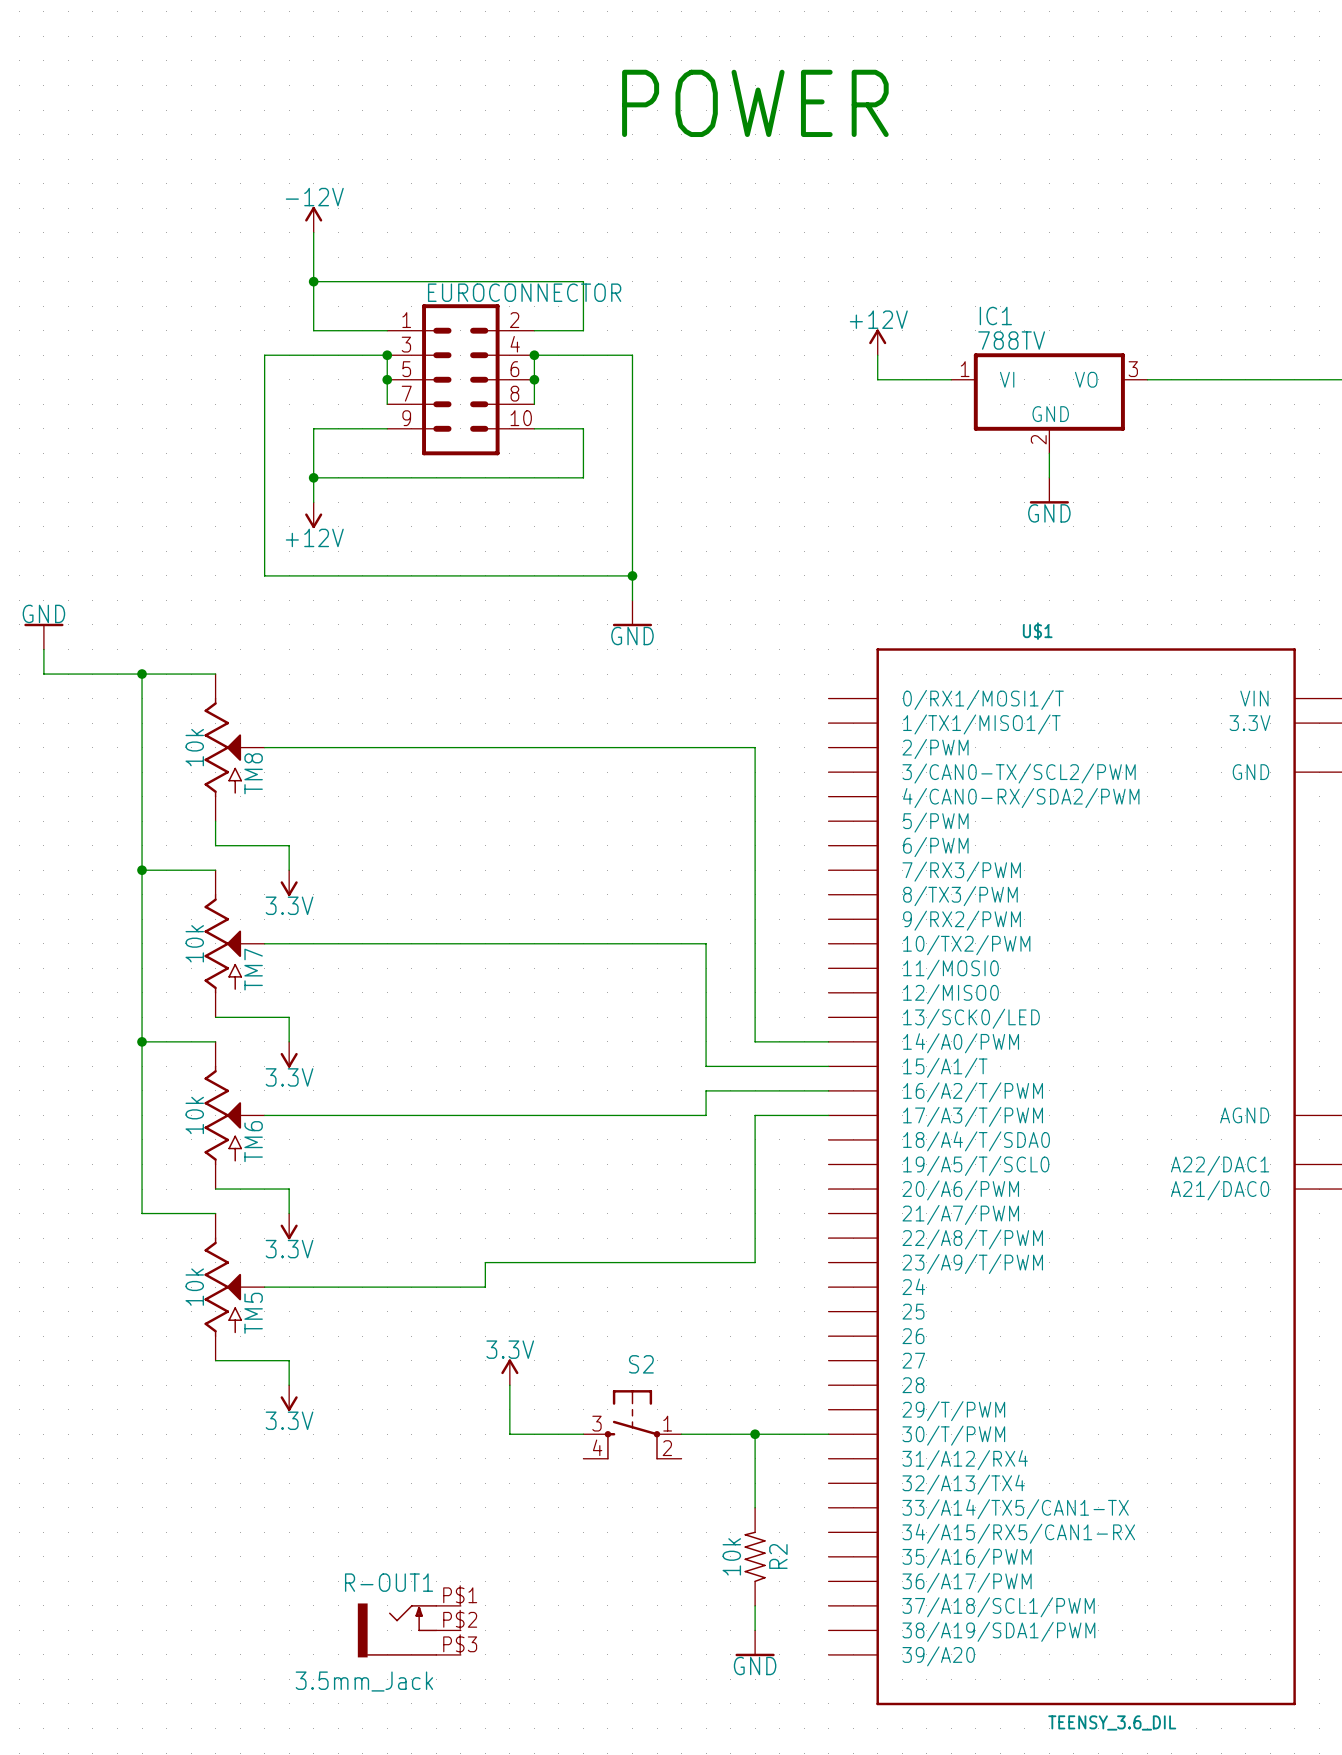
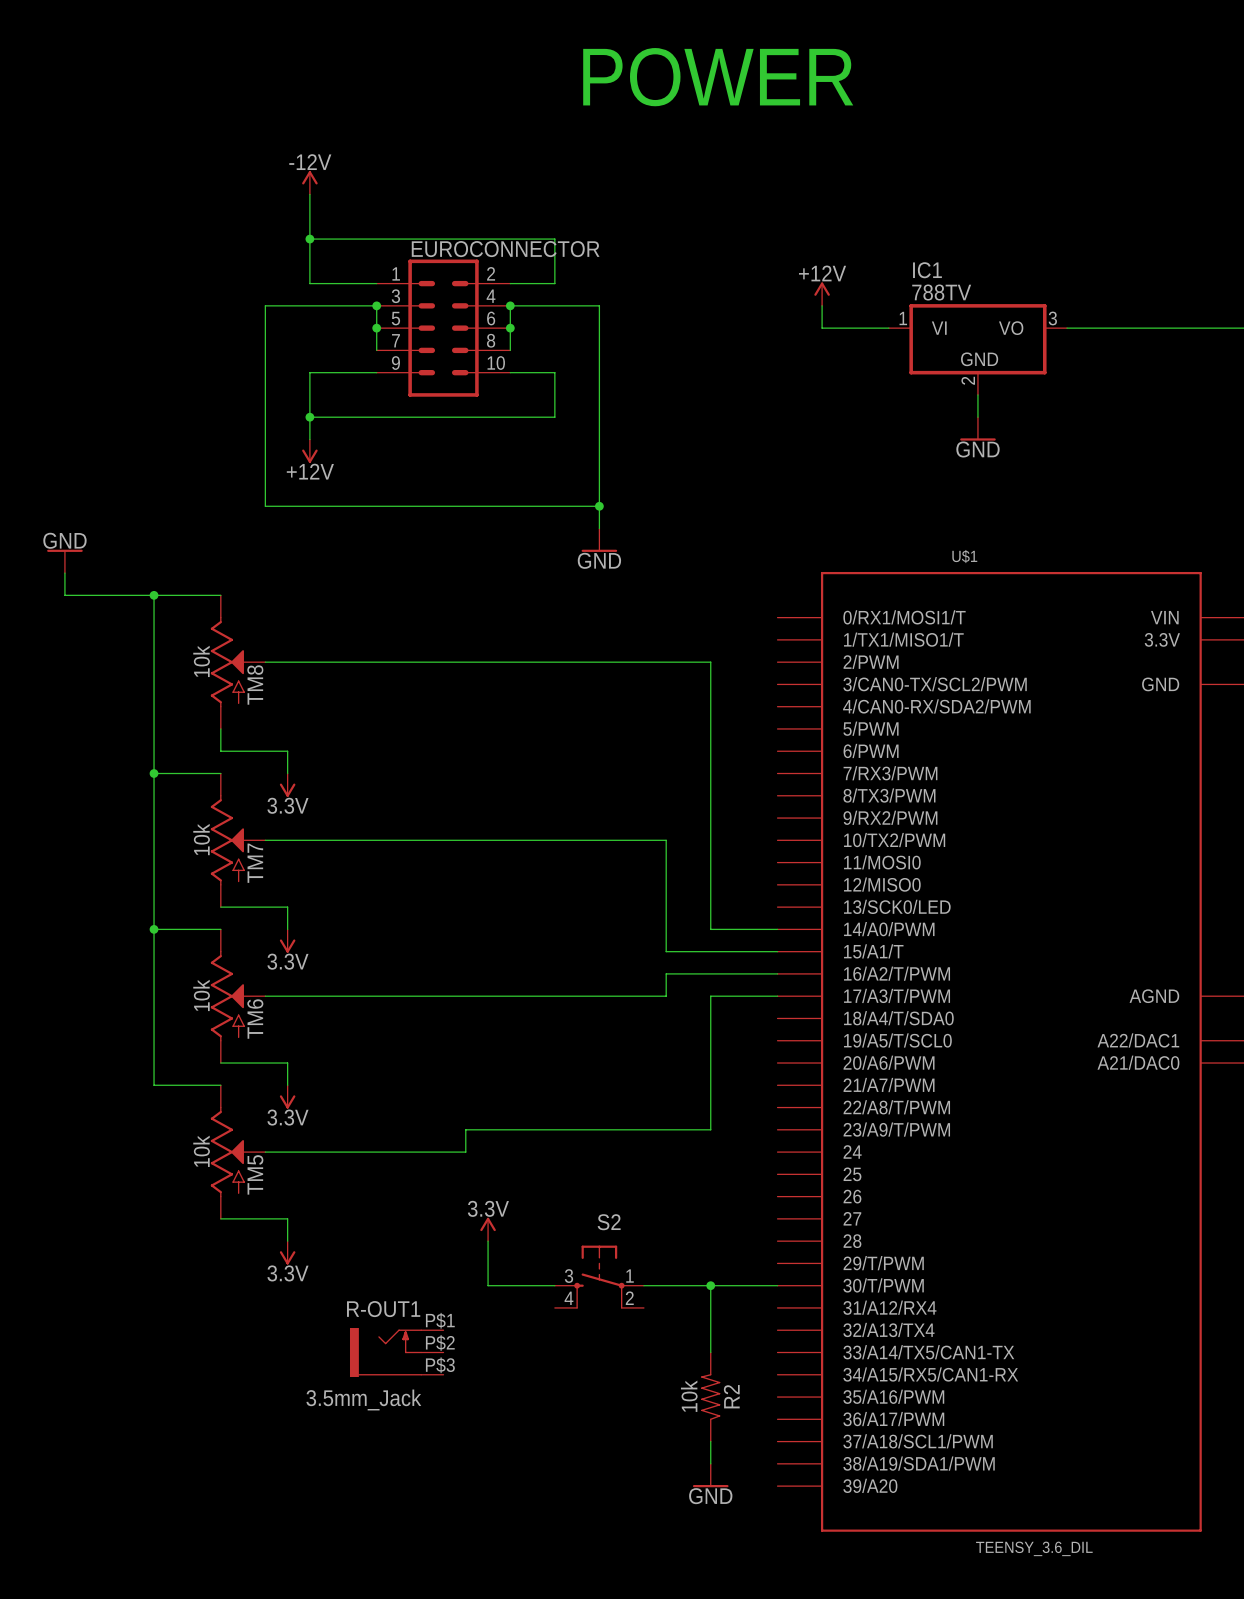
R-OUT1 position: (409, 1630) -> (396, 1352)

